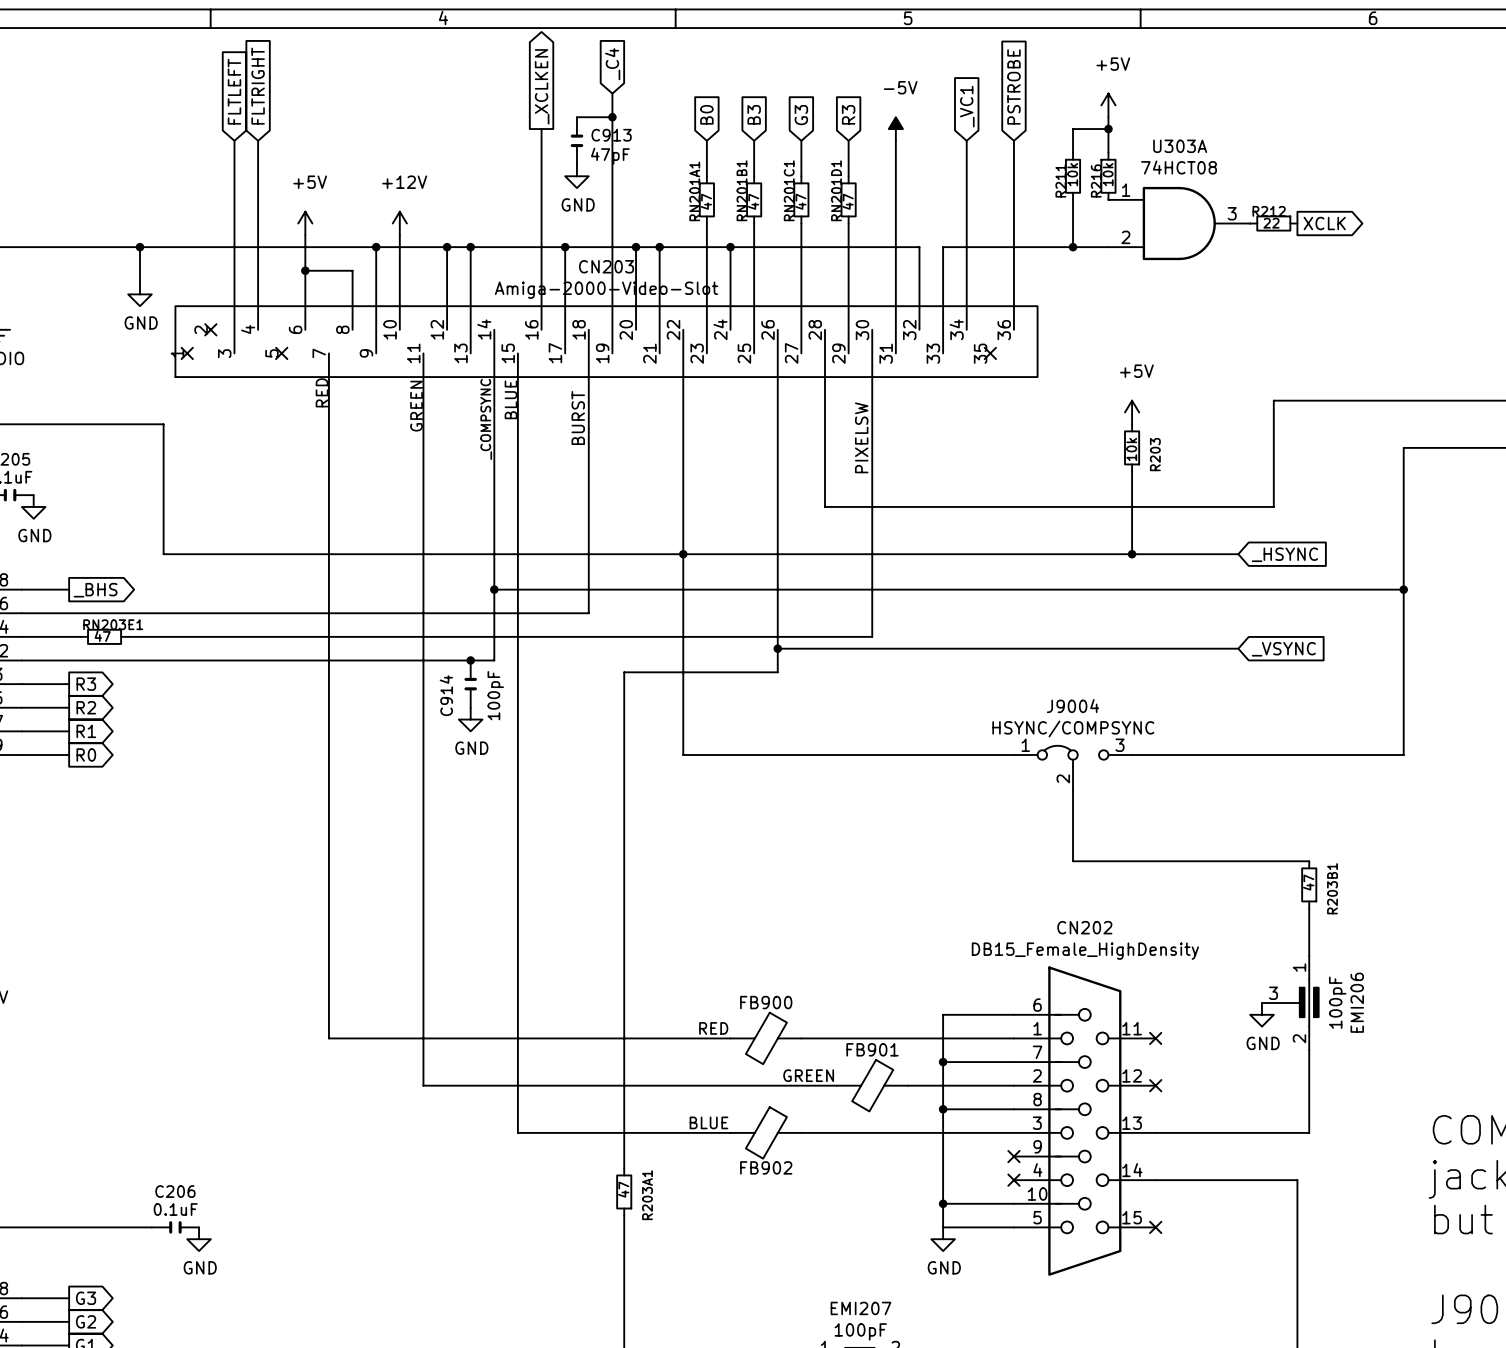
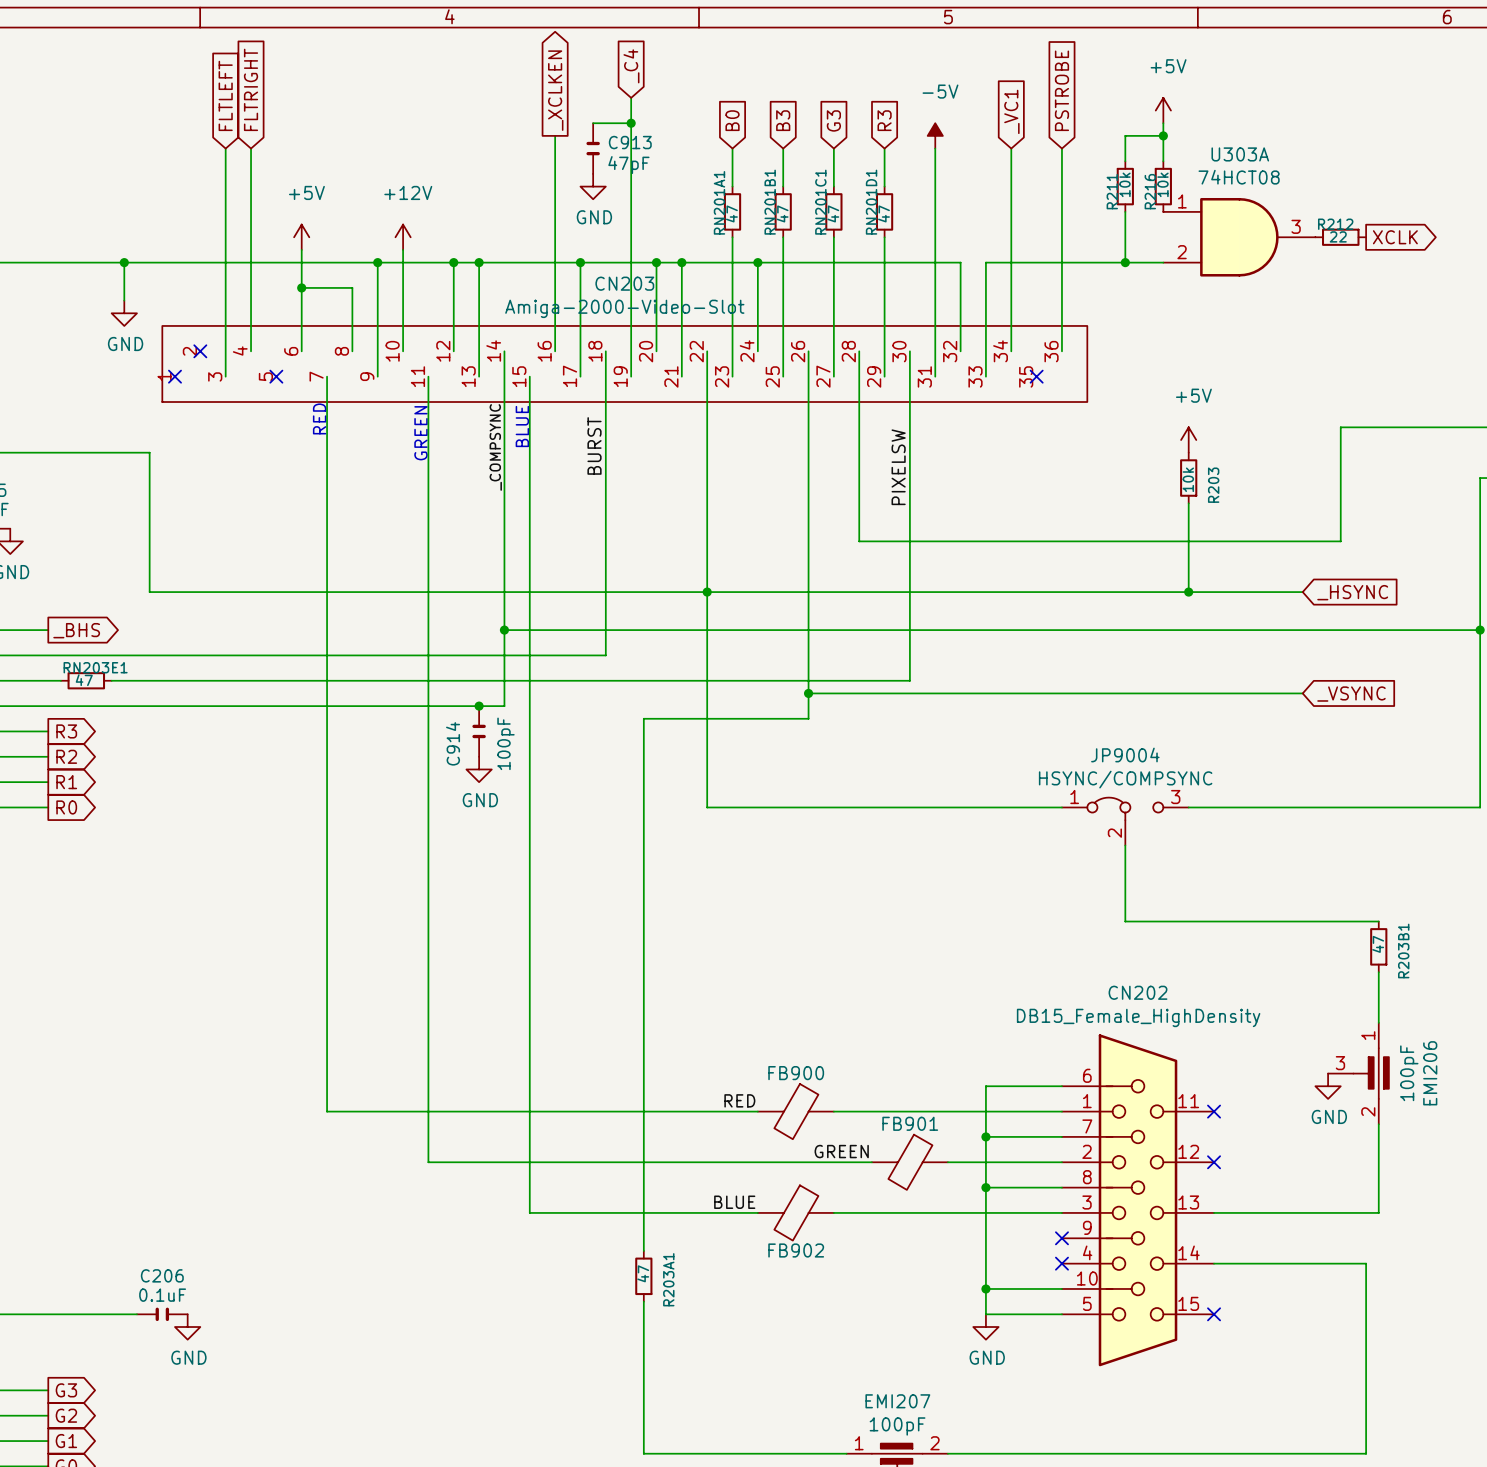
J9004 name: J9004 (1073, 706) -> JP9004 (1125, 755)

